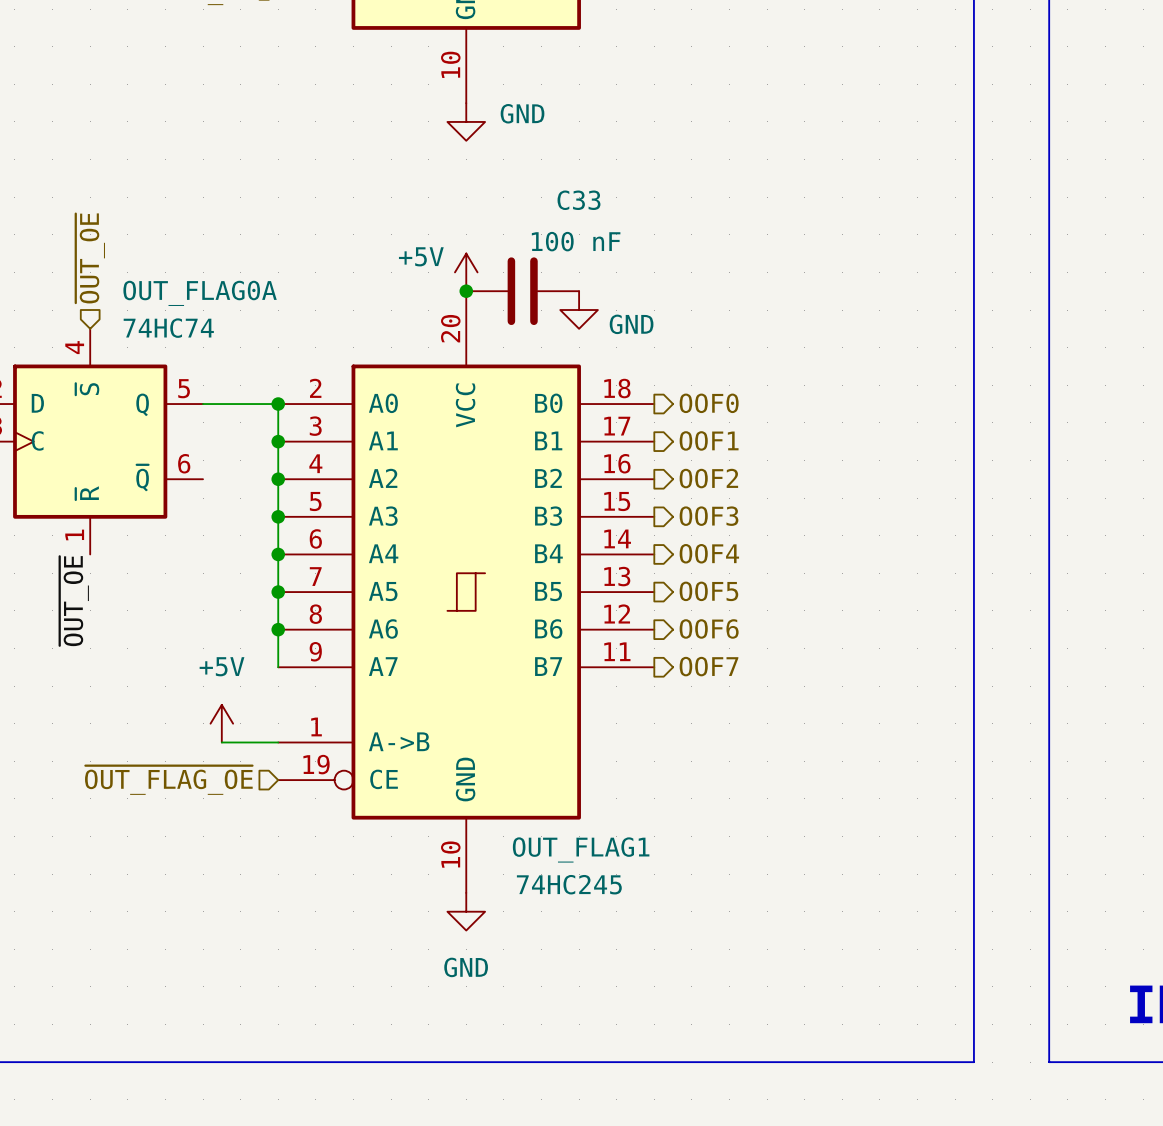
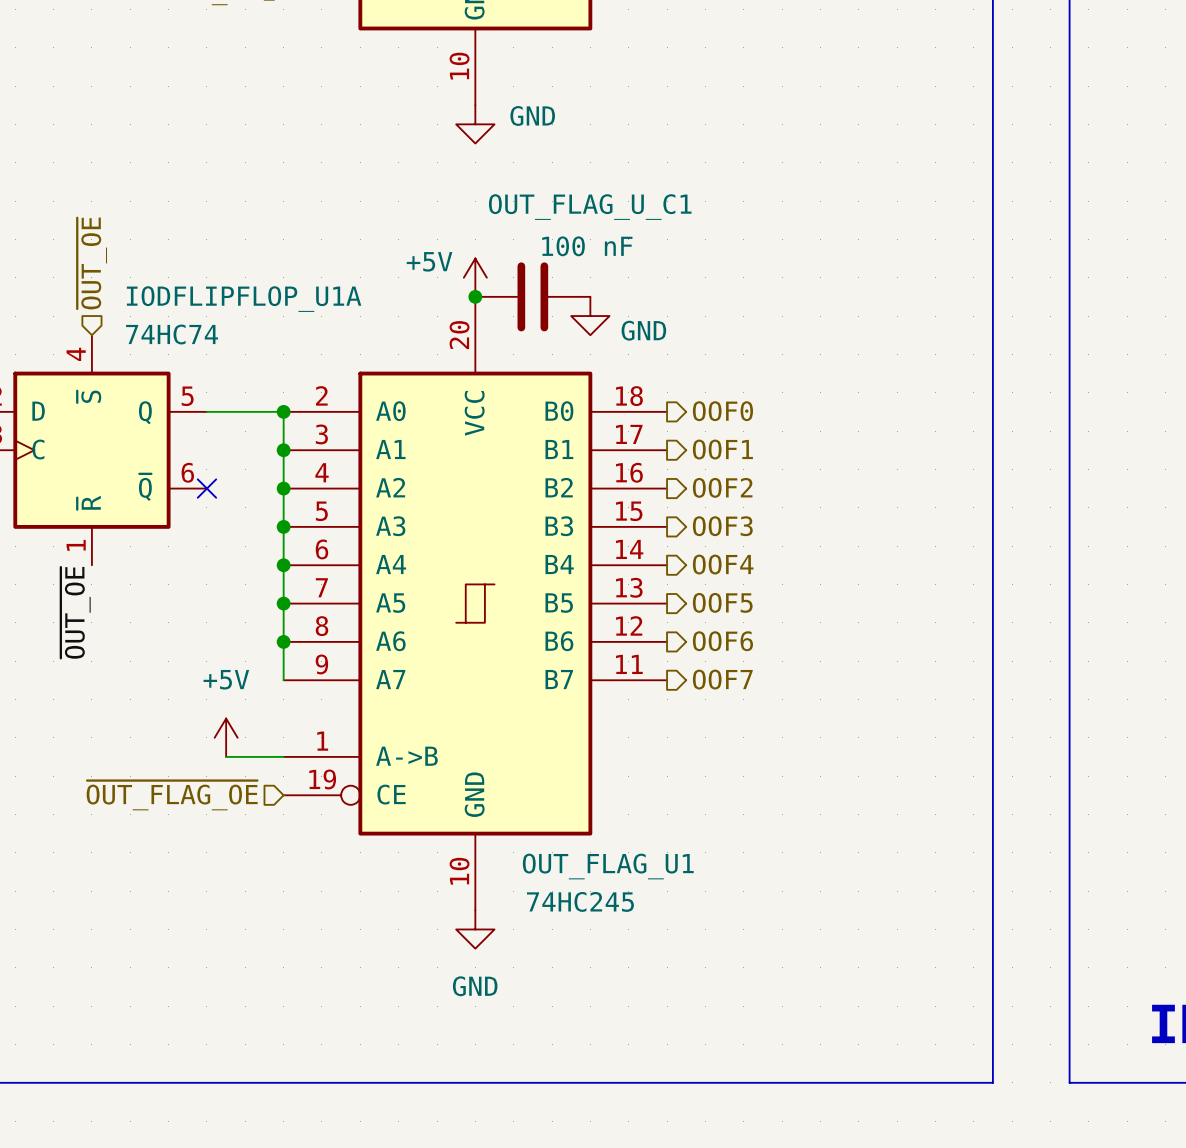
C33 name: C33 (578, 200) -> OUT_FLAG_U_C1 (590, 207)
OUT_FLAG0A name: OUT_FLAG0A (200, 293) -> IODFLIPFLOP_U1A (244, 299)
no-connect mark: none -> (206, 488)
OUT_FLAG1 name: OUT_FLAG1 (581, 849) -> OUT_FLAG_U1 (608, 866)

